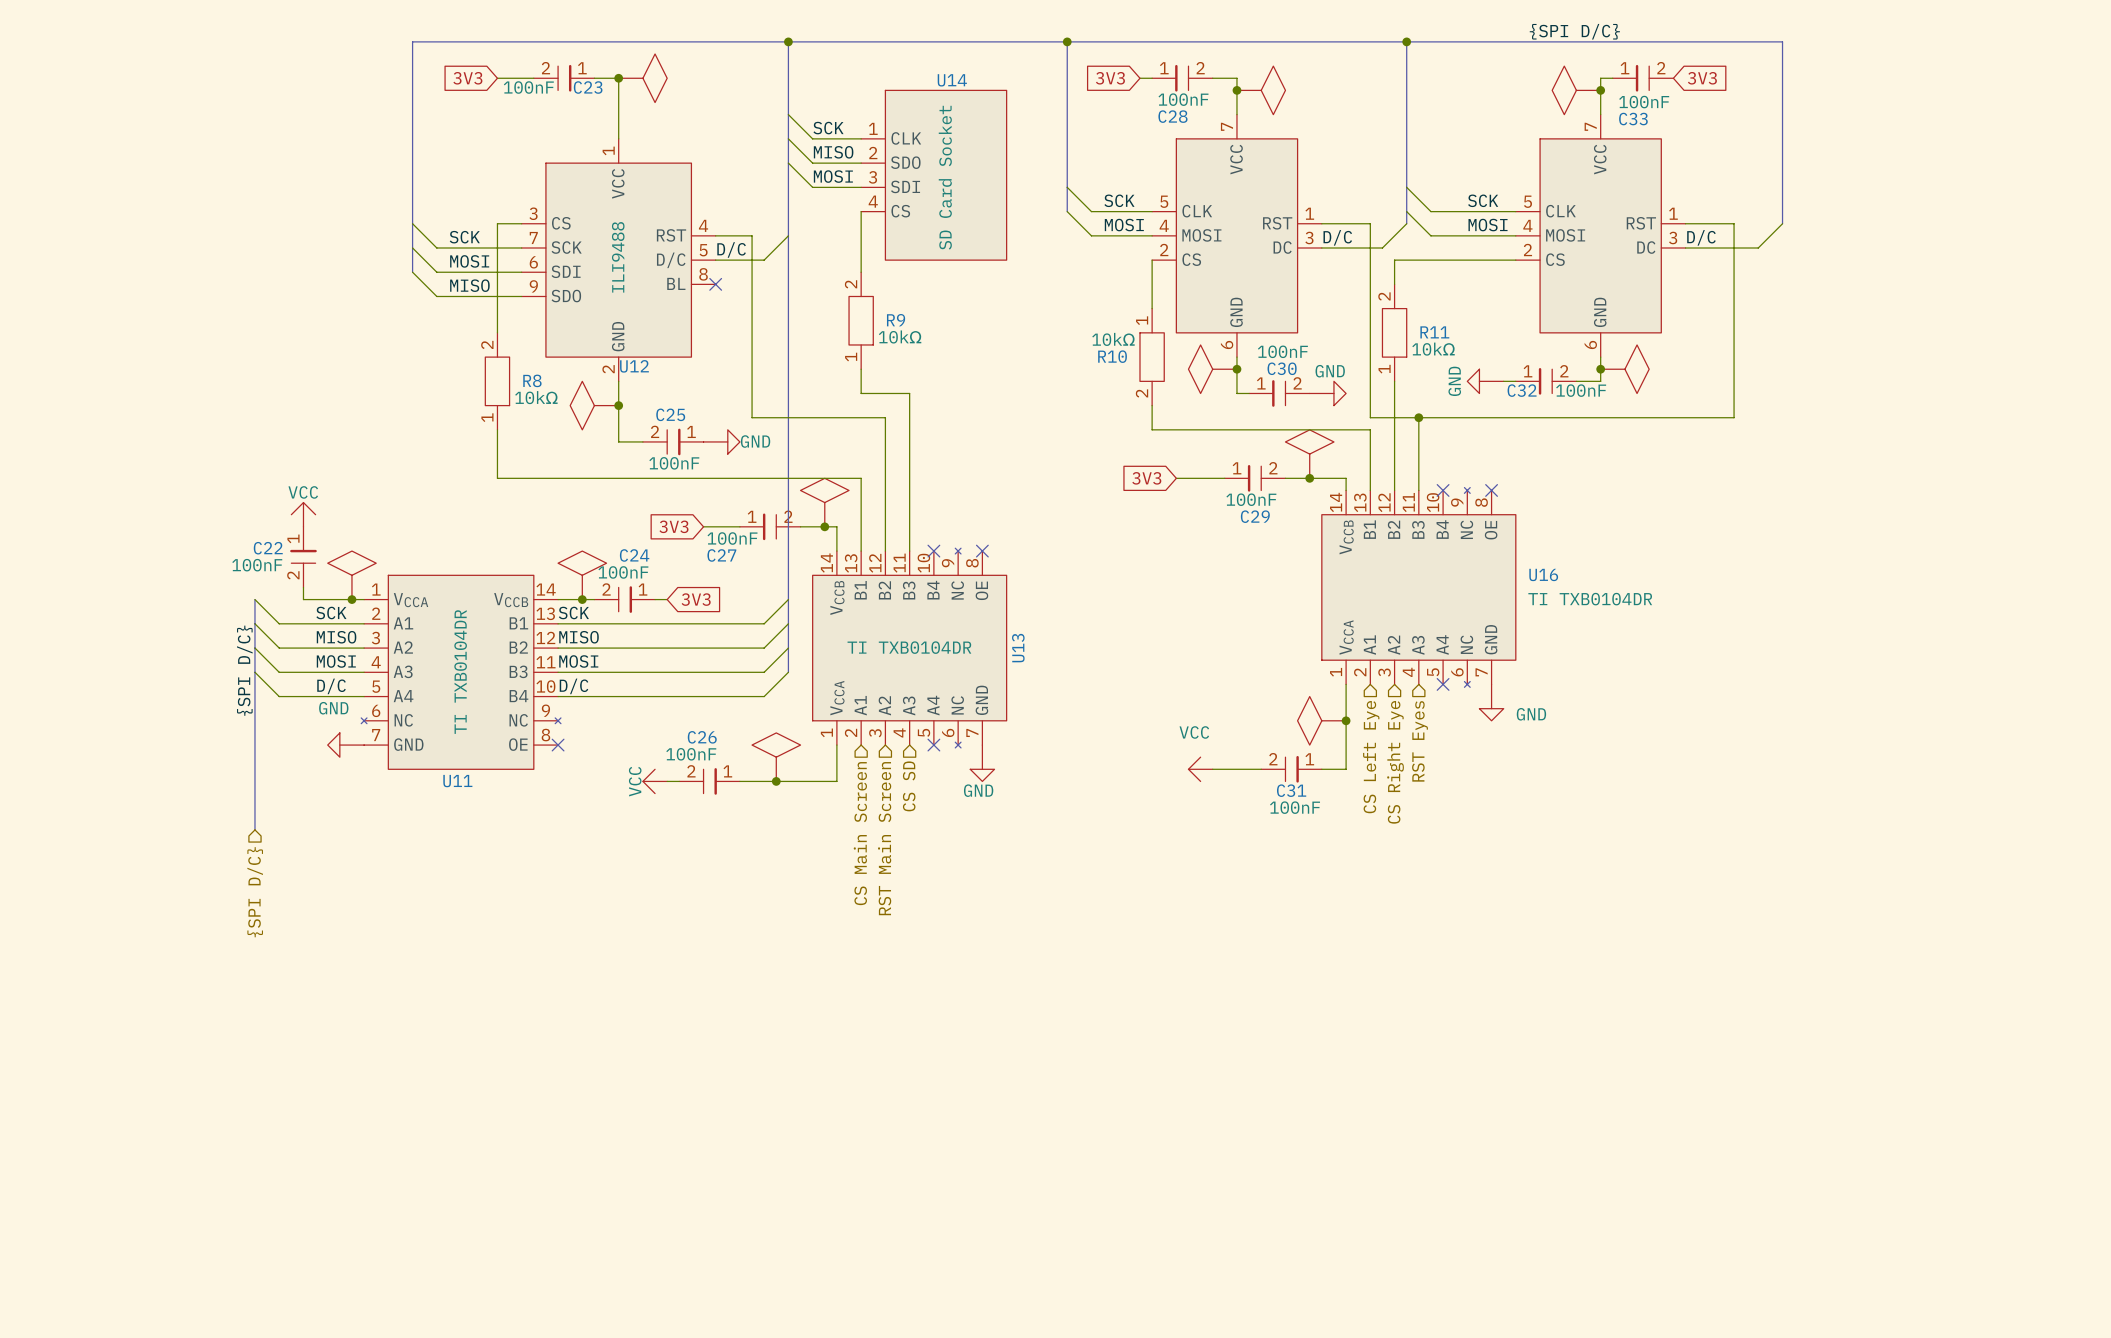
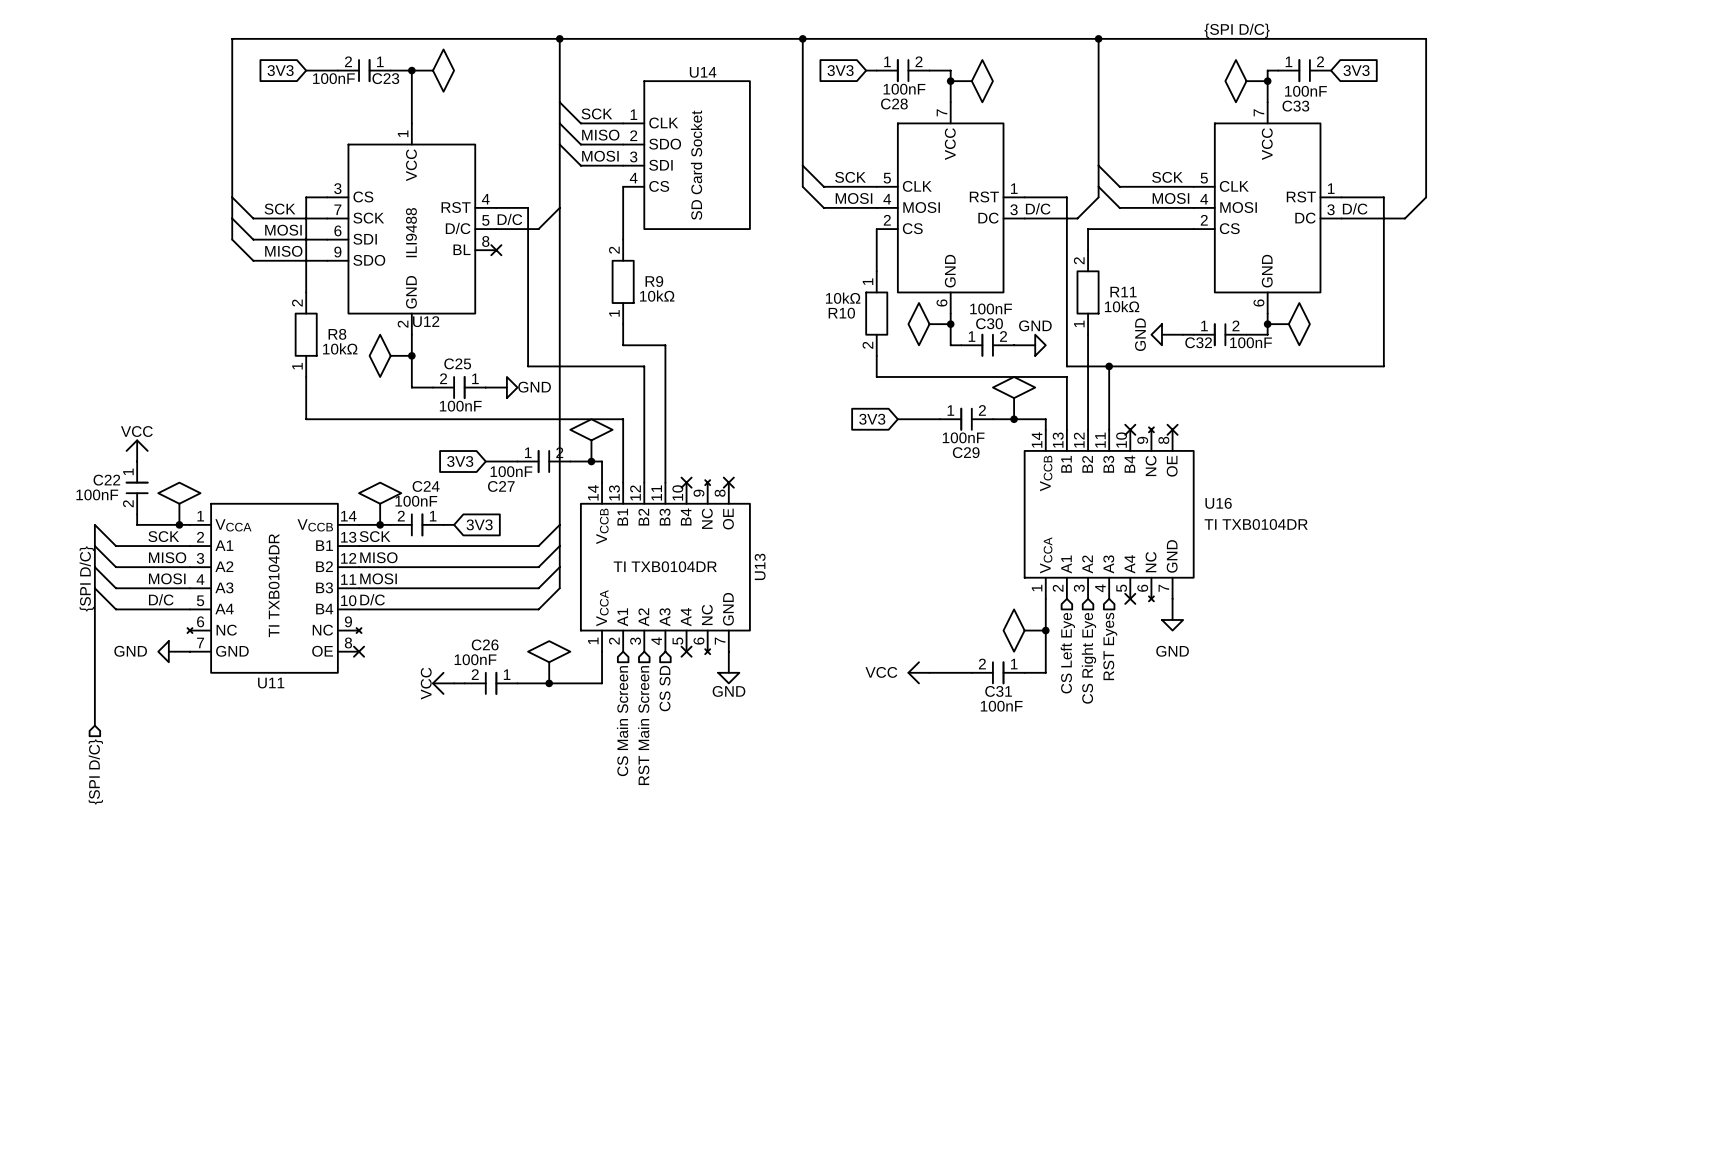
power symbol text position: GND (333, 708) -> GND (130, 651)
power symbol text position: GND (1531, 714) -> GND (1172, 651)
power symbol text position: VCC (1194, 732) -> VCC (881, 672)

